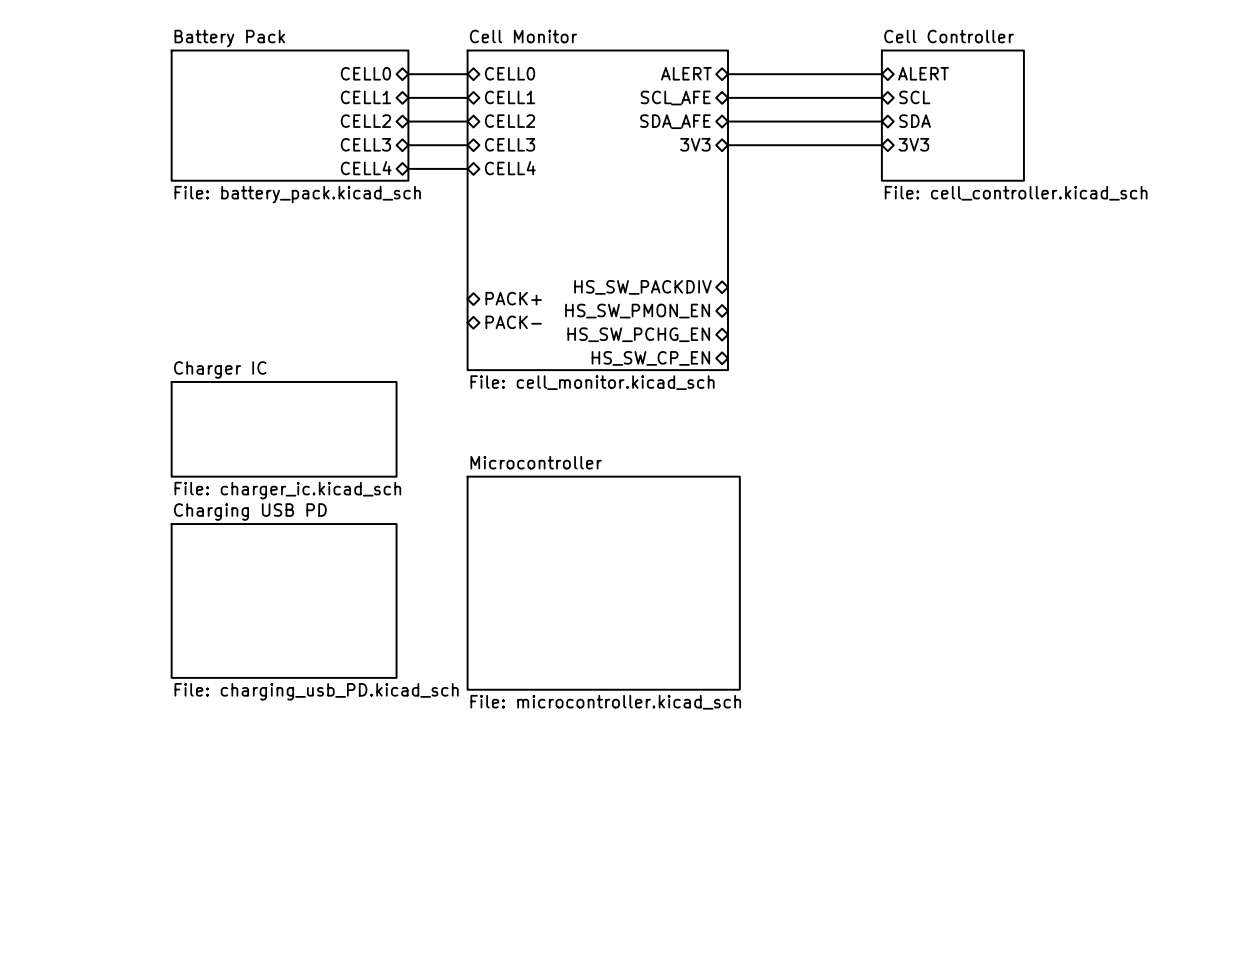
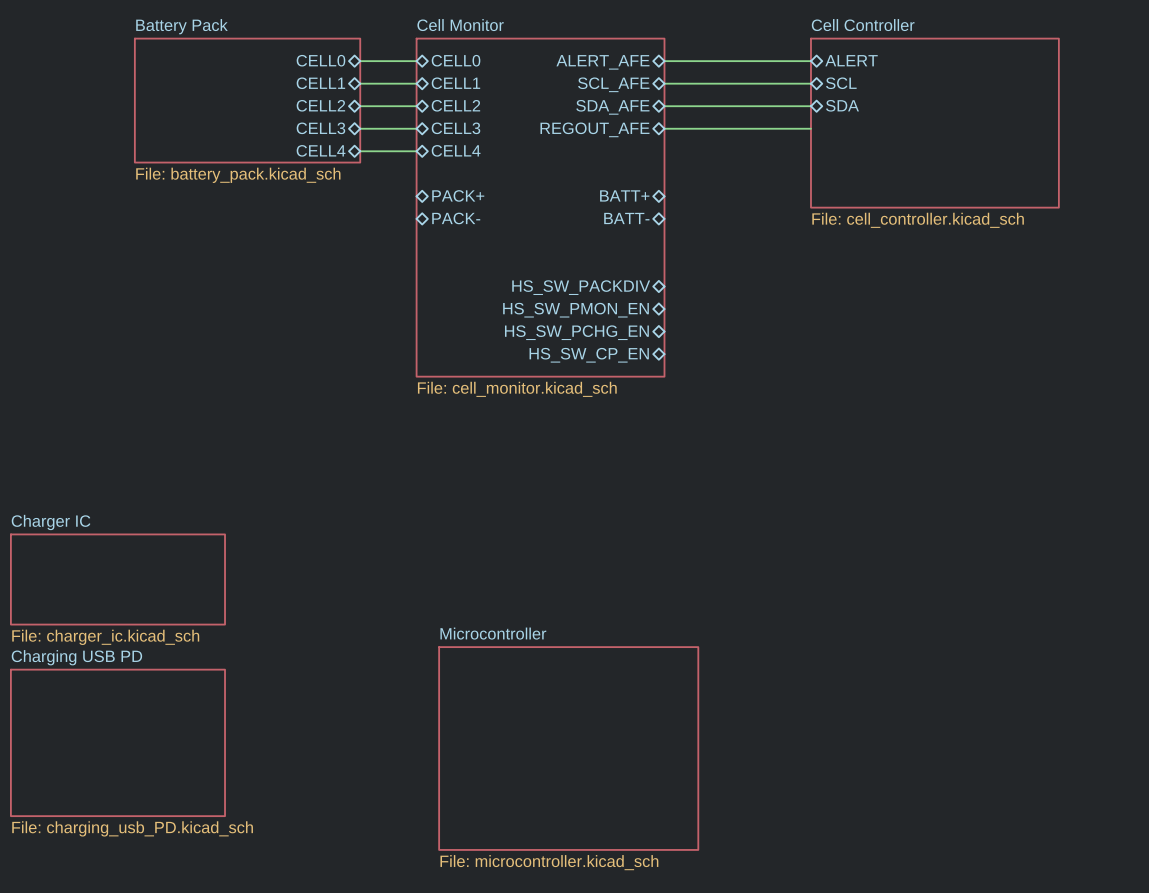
sheet pin: ALERT (686, 73) -> ALERT_AFE (602, 62)
sheet Cell Controller: File: cell_controller.kicad_sch (952, 115) -> none
sheet Cell Controller: none -> File: cell_controller.kicad_sch (934, 123)
sheet pin: 3V3 (695, 144) -> REGOUT_AFE (594, 129)
sheet pin: 3V3 (913, 144) -> none
sheet Cell Monitor: File: cell_monitor.kicad_sch (597, 210) -> none
sheet pin: none -> BATT+ (624, 195)
sheet Cell Monitor: none -> File: cell_monitor.kicad_sch (540, 207)
sheet pin: none -> BATT- (626, 218)
sheet pin: HS_SW_PACKDIV (642, 287) -> none
sheet pin position: PACK+ (513, 298) -> PACK+ (458, 195)
sheet pin: HS_SW_PMON_EN (637, 311) -> HS_SW_PACKDIV (581, 287)
sheet pin position: PACK- (513, 322) -> PACK- (456, 218)
sheet pin: HS_SW_PCHG_EN (638, 334) -> HS_SW_PMON_EN (576, 310)
sheet pin: HS_SW_CP_EN (650, 358) -> HS_SW_PCHG_EN (576, 332)
sheet pin: none -> HS_SW_CP_EN (589, 355)
sheet Charger IC position: (284, 429) -> (117, 579)
sheet Microcontroller position: (603, 583) -> (568, 748)
sheet Charging USB PD position: (284, 600) -> (117, 742)

